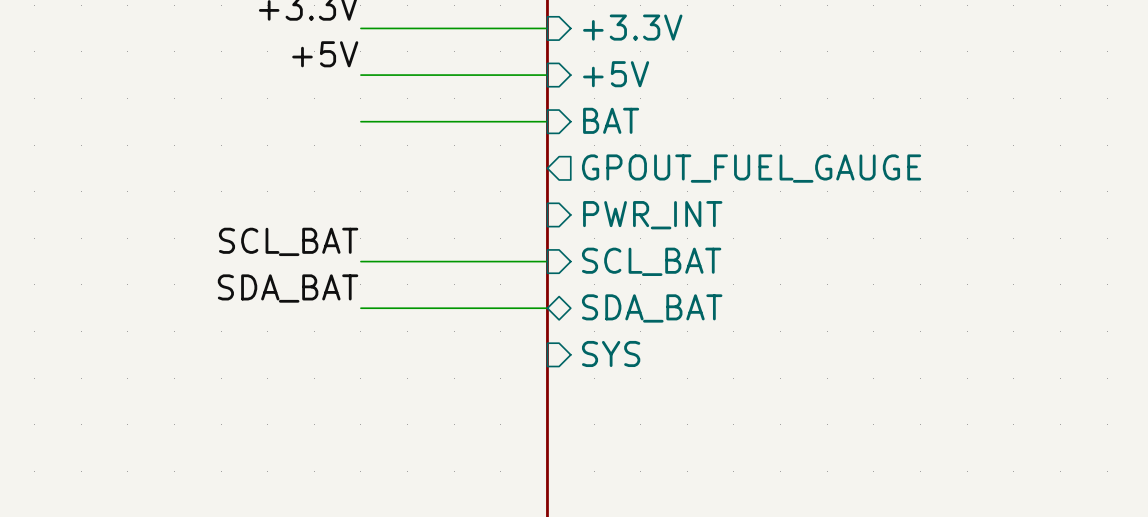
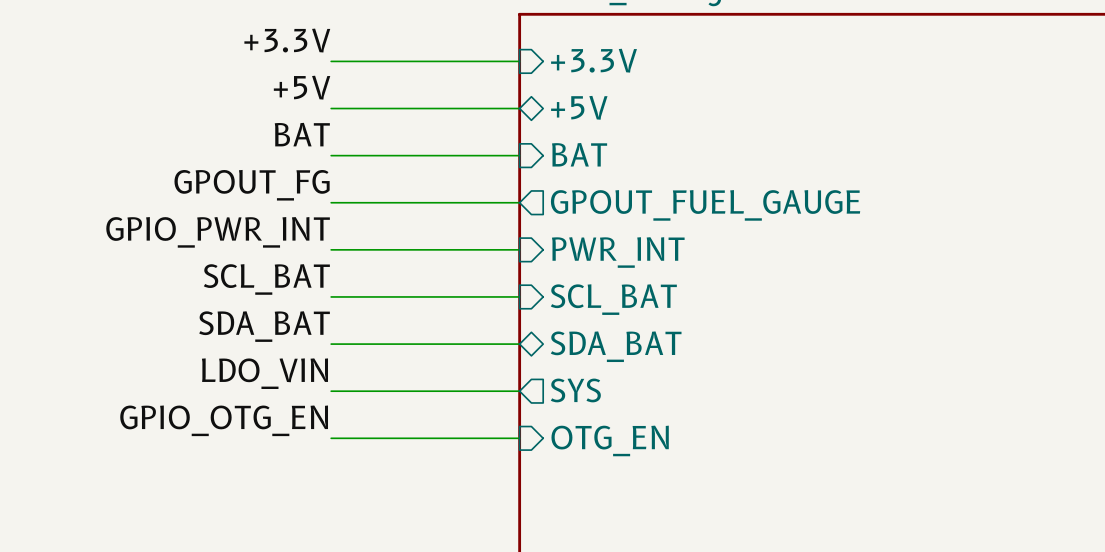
sheet pin shape: input (616, 74) -> bidirectional (579, 107)
label: none -> BAT (302, 134)
label: none -> GPOUT_FG (252, 185)
wire: none -> (331, 202) (519, 202)
label: none -> GPIO_PWR_INT (218, 232)
wire: none -> (331, 249) (519, 249)
label: none -> LDO_VIN (264, 373)
sheet pin shape: input (611, 353) -> output (575, 390)
wire: none -> (331, 391) (519, 391)
label: none -> GPIO_OTG_EN (224, 420)
wire: none -> (331, 438) (519, 438)
sheet pin: none -> OTG_EN (610, 440)

